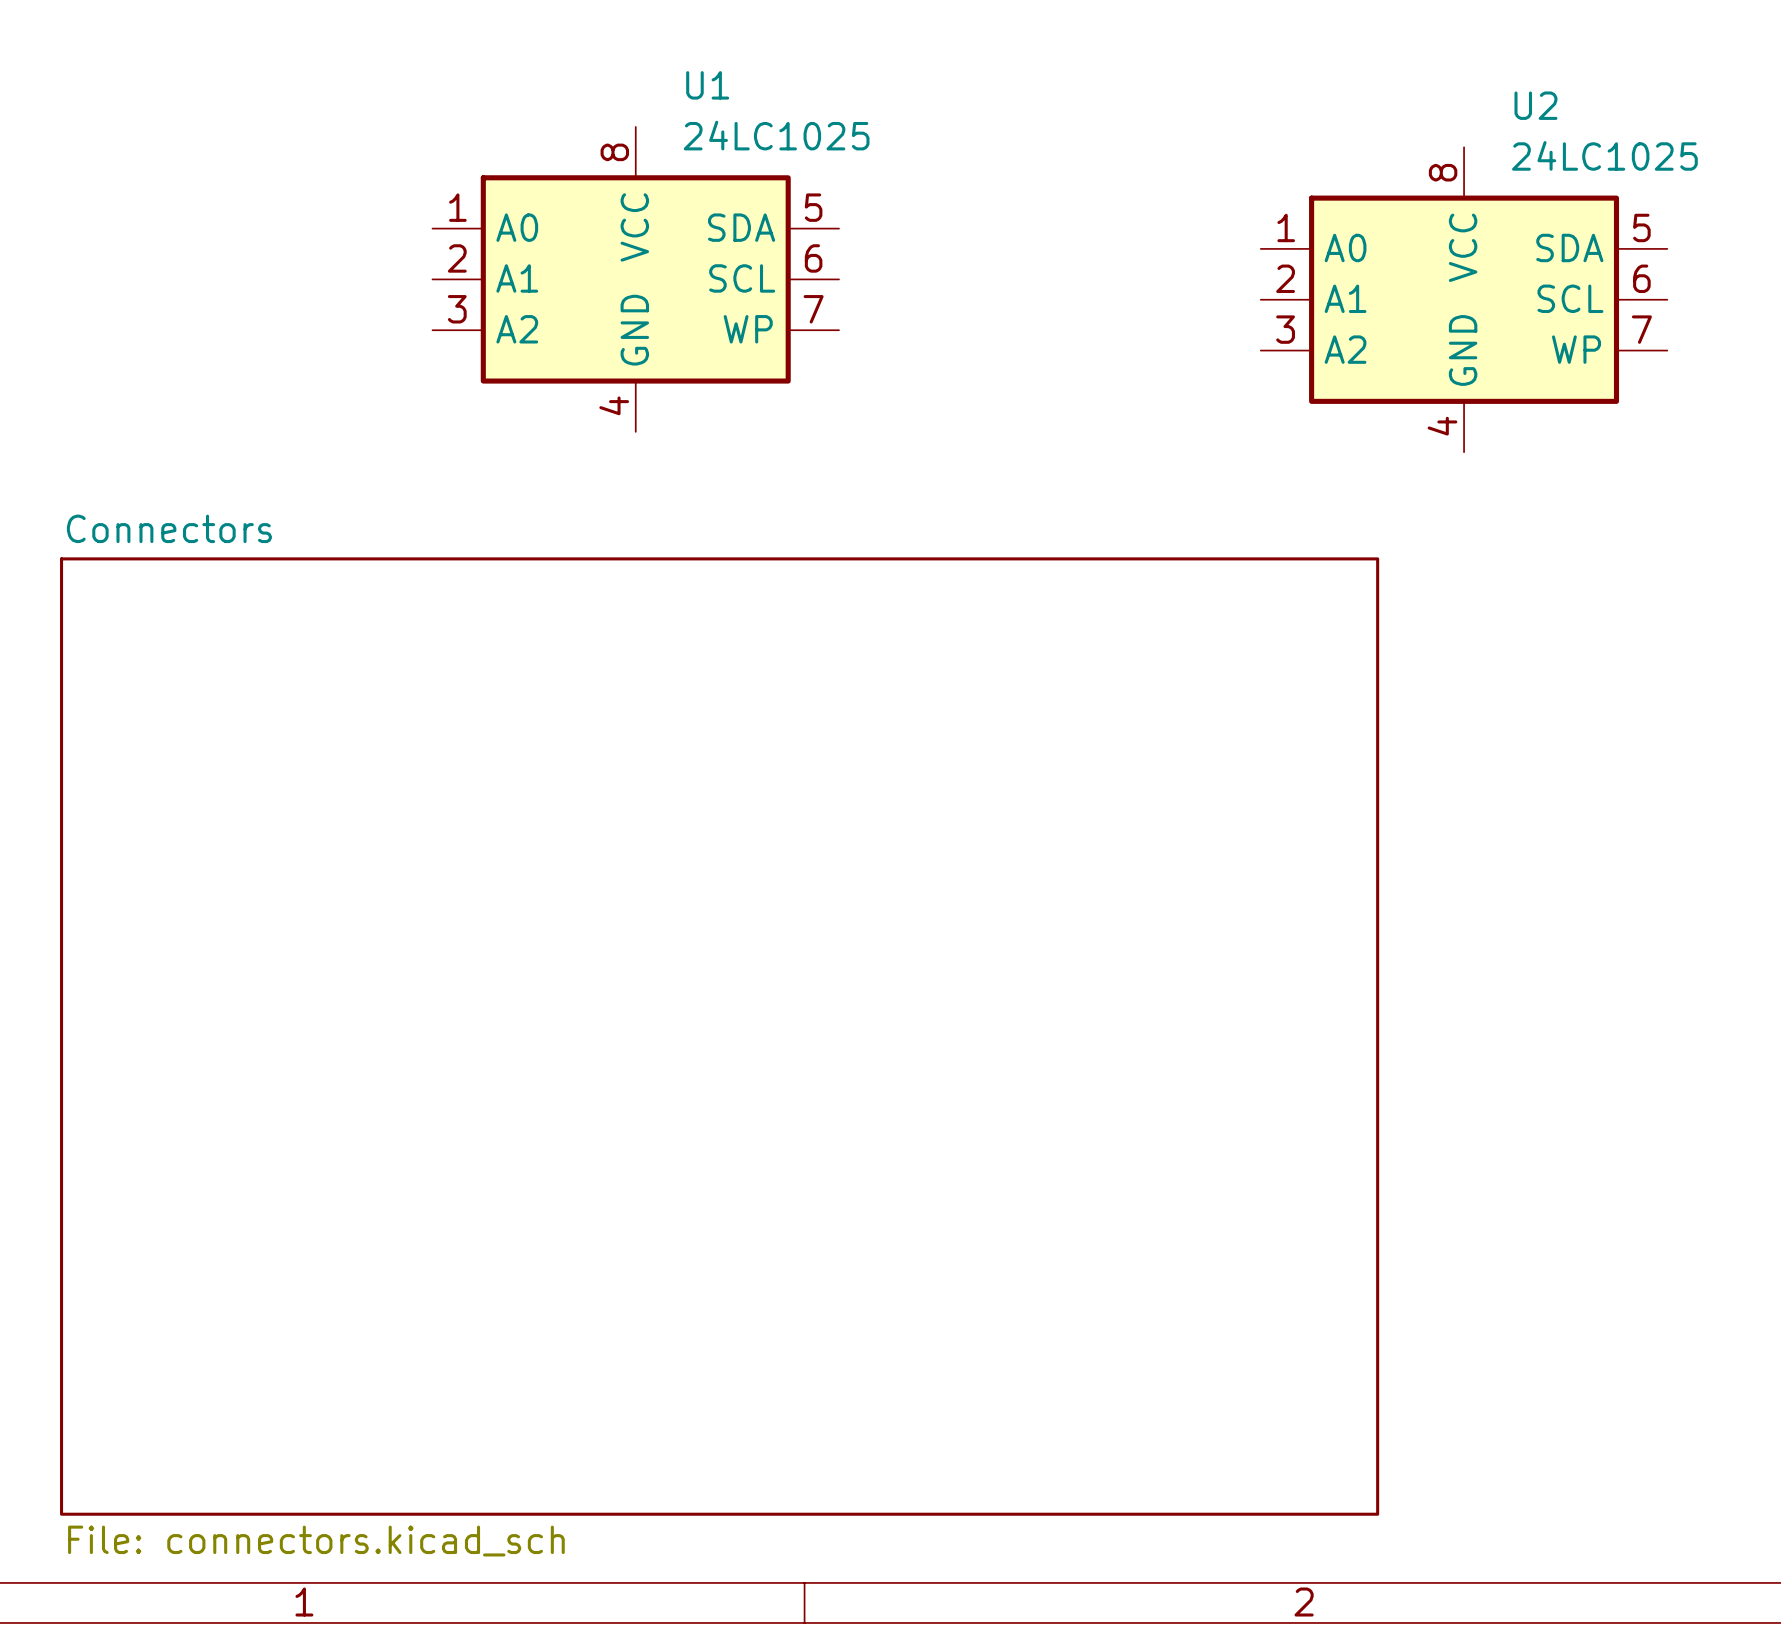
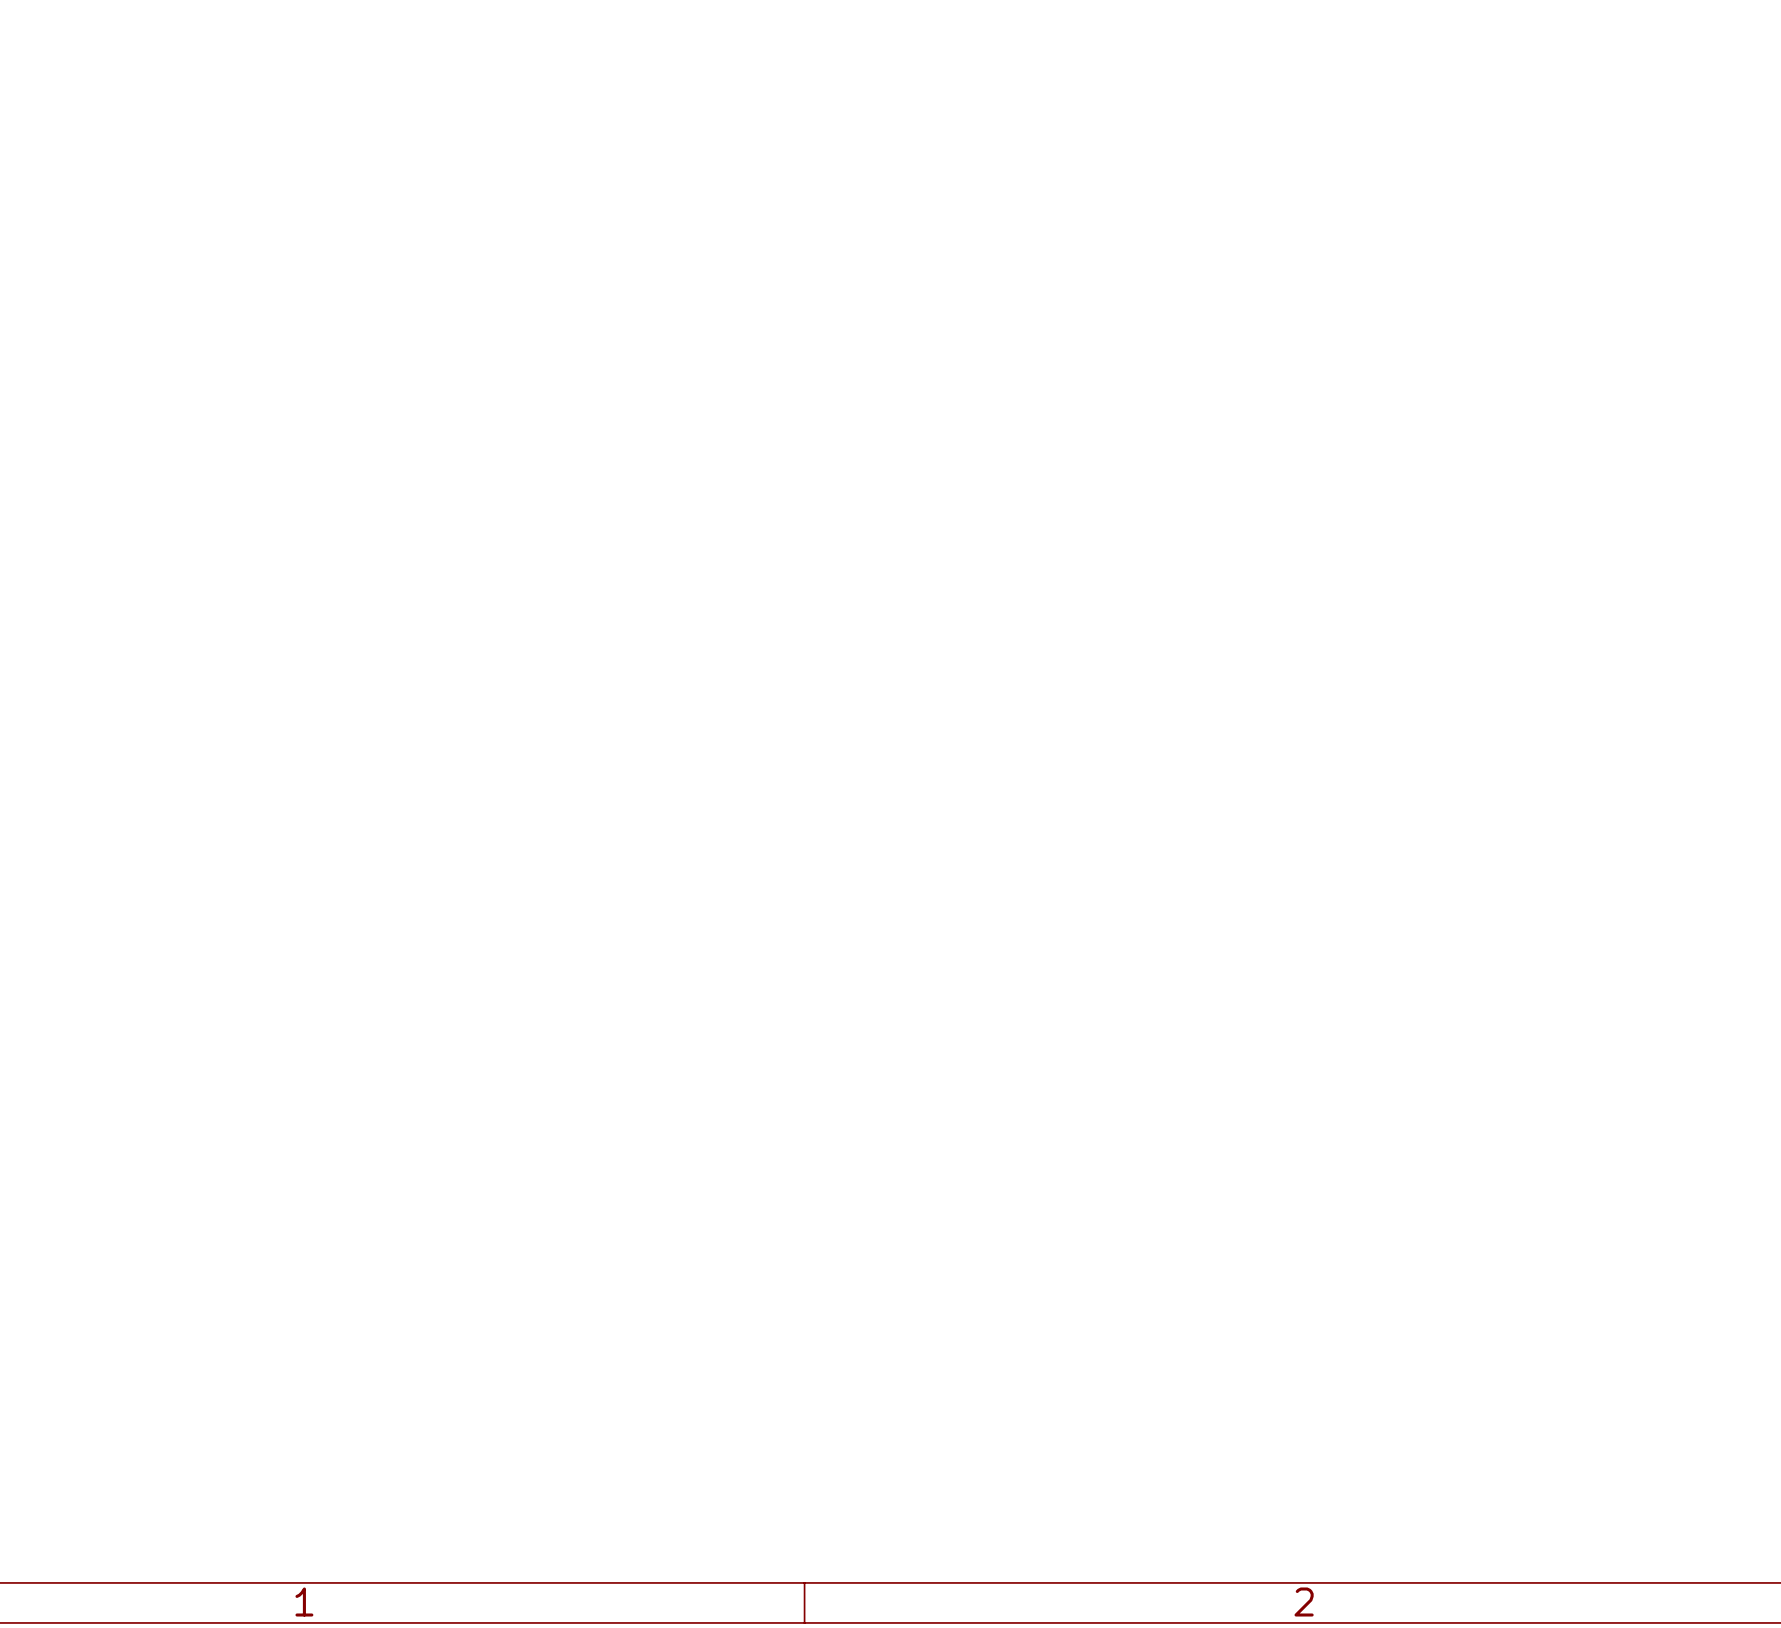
U1: 24LC1025 (635, 279) -> none
U2: 24LC1025 (1464, 299) -> none
sheet Connectors: File: connectors.kicad_sch (719, 1036) -> none

